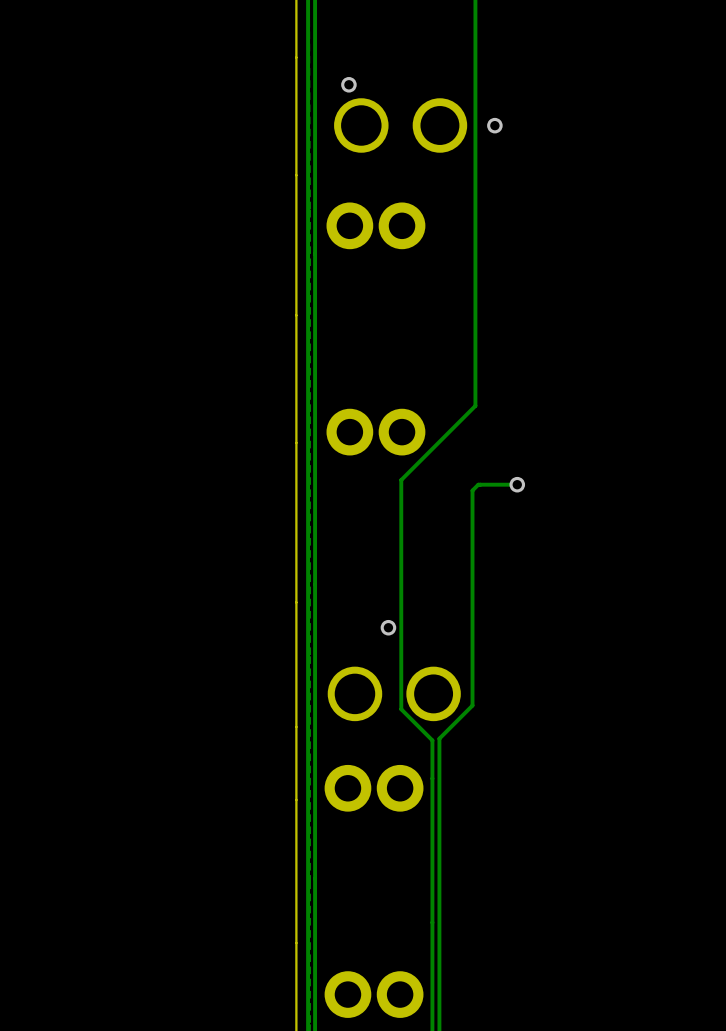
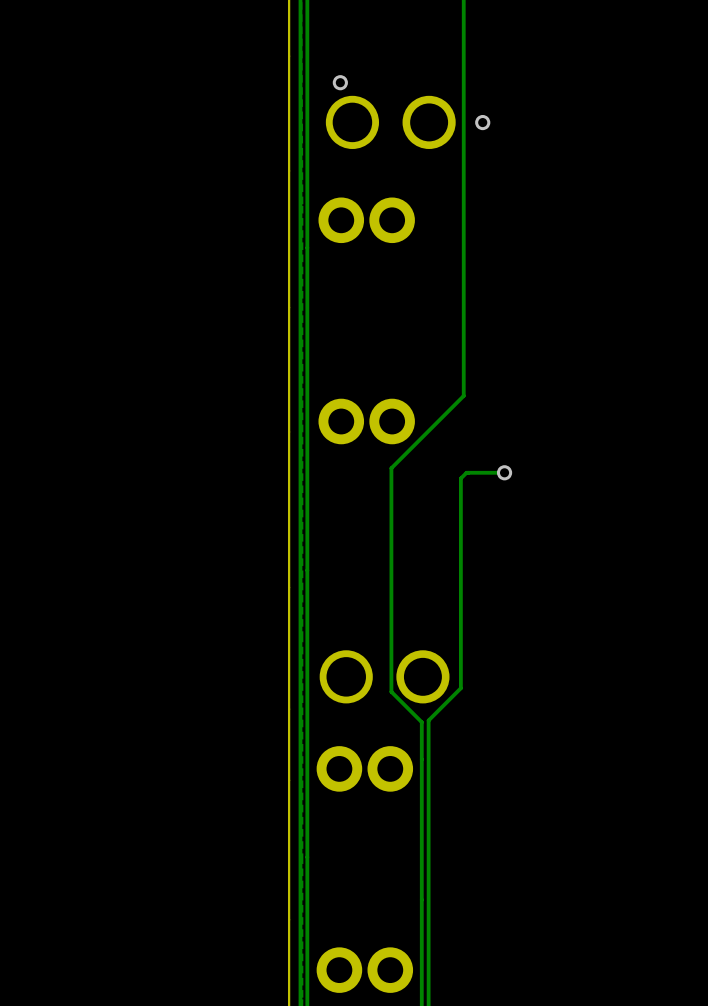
via: (388, 627) -> none

